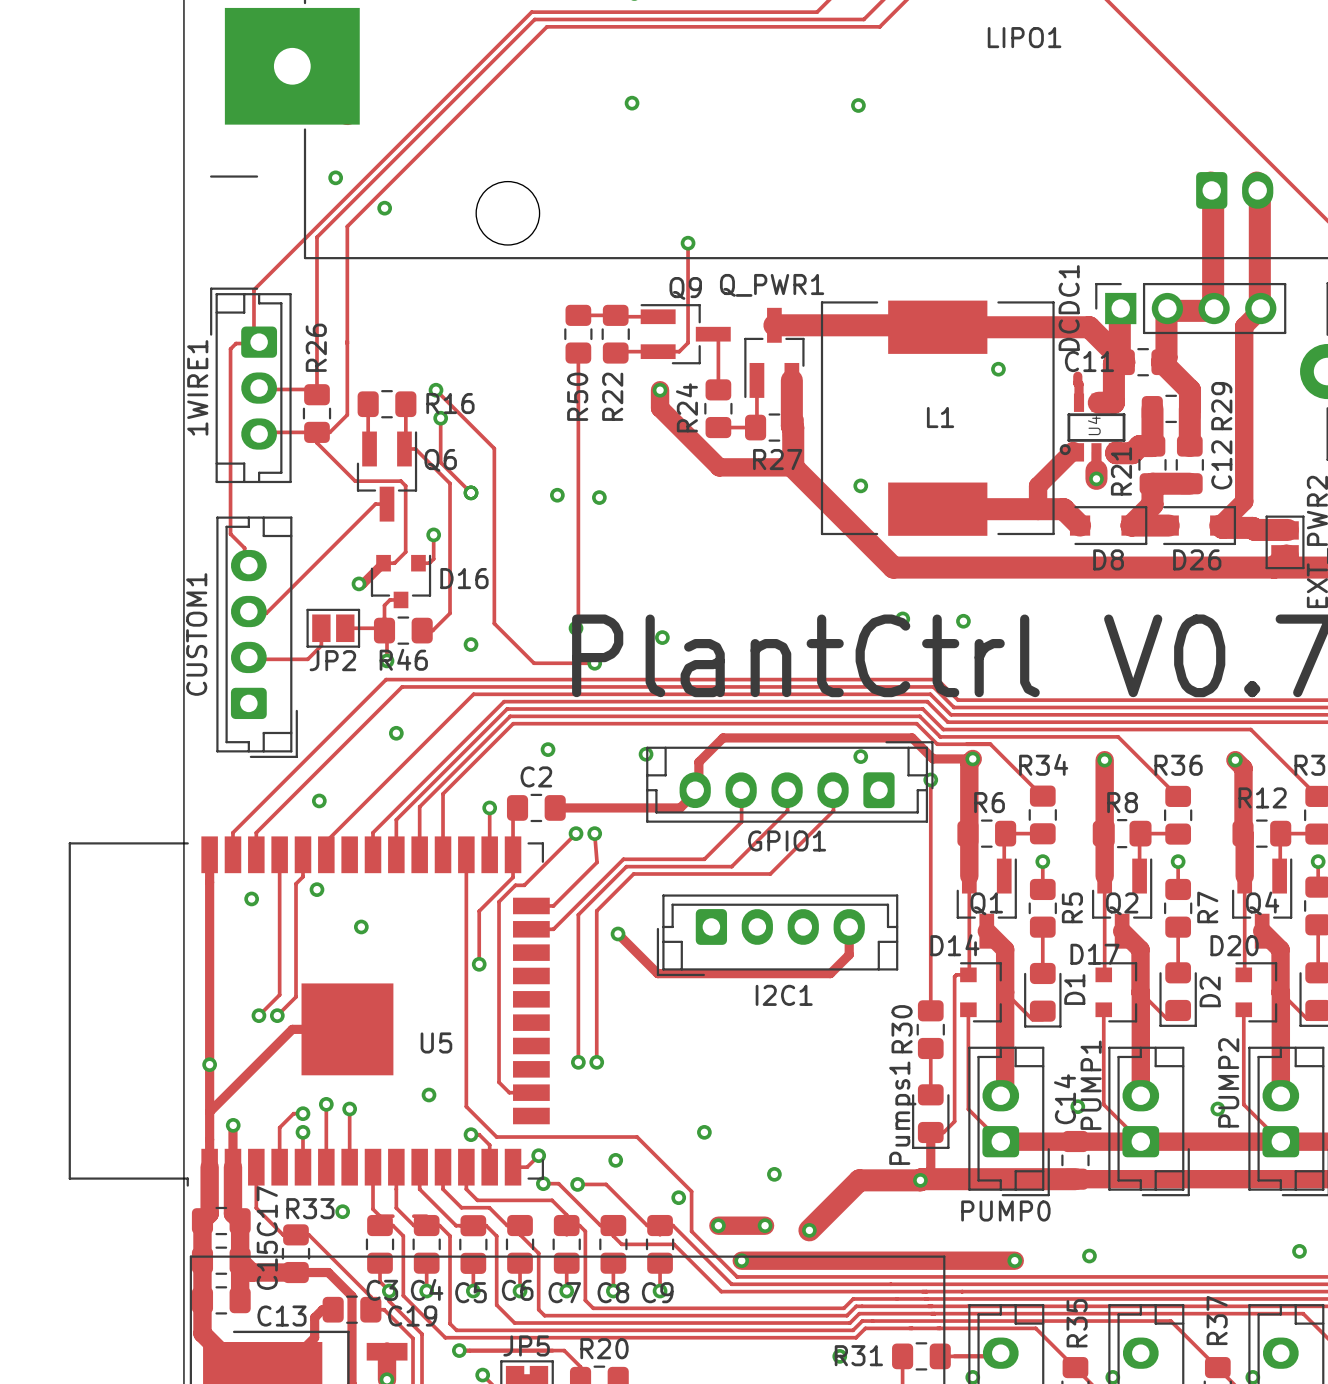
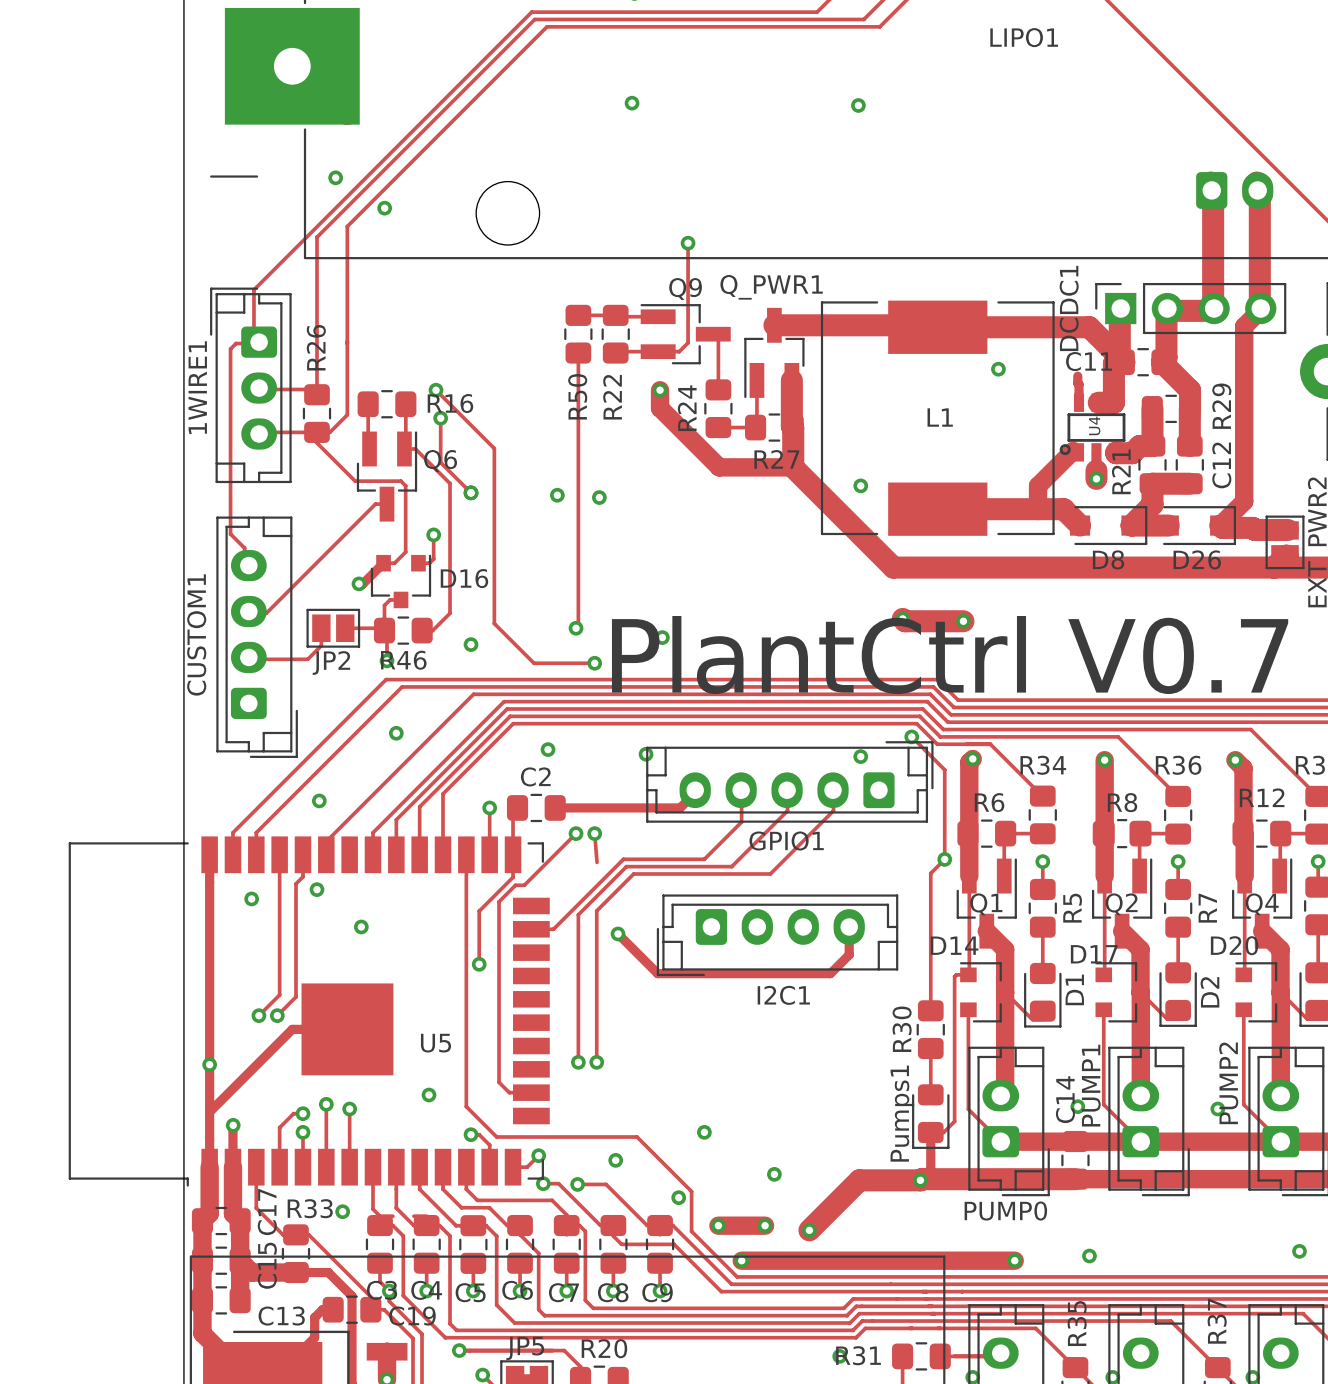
track: none -> (902, 618) (905, 621) (963, 621)
via: none -> (911, 736)
track: (972, 758) (933, 758) (912, 737) (723, 737) (698, 762) (698, 789) -> none
track: (930, 779) (930, 873) -> (911, 736) (944, 769) (944, 859) (930, 873)
via: (930, 779) -> none
via: none -> (944, 859)
track: (597, 862) (553, 905) (531, 905) -> none

